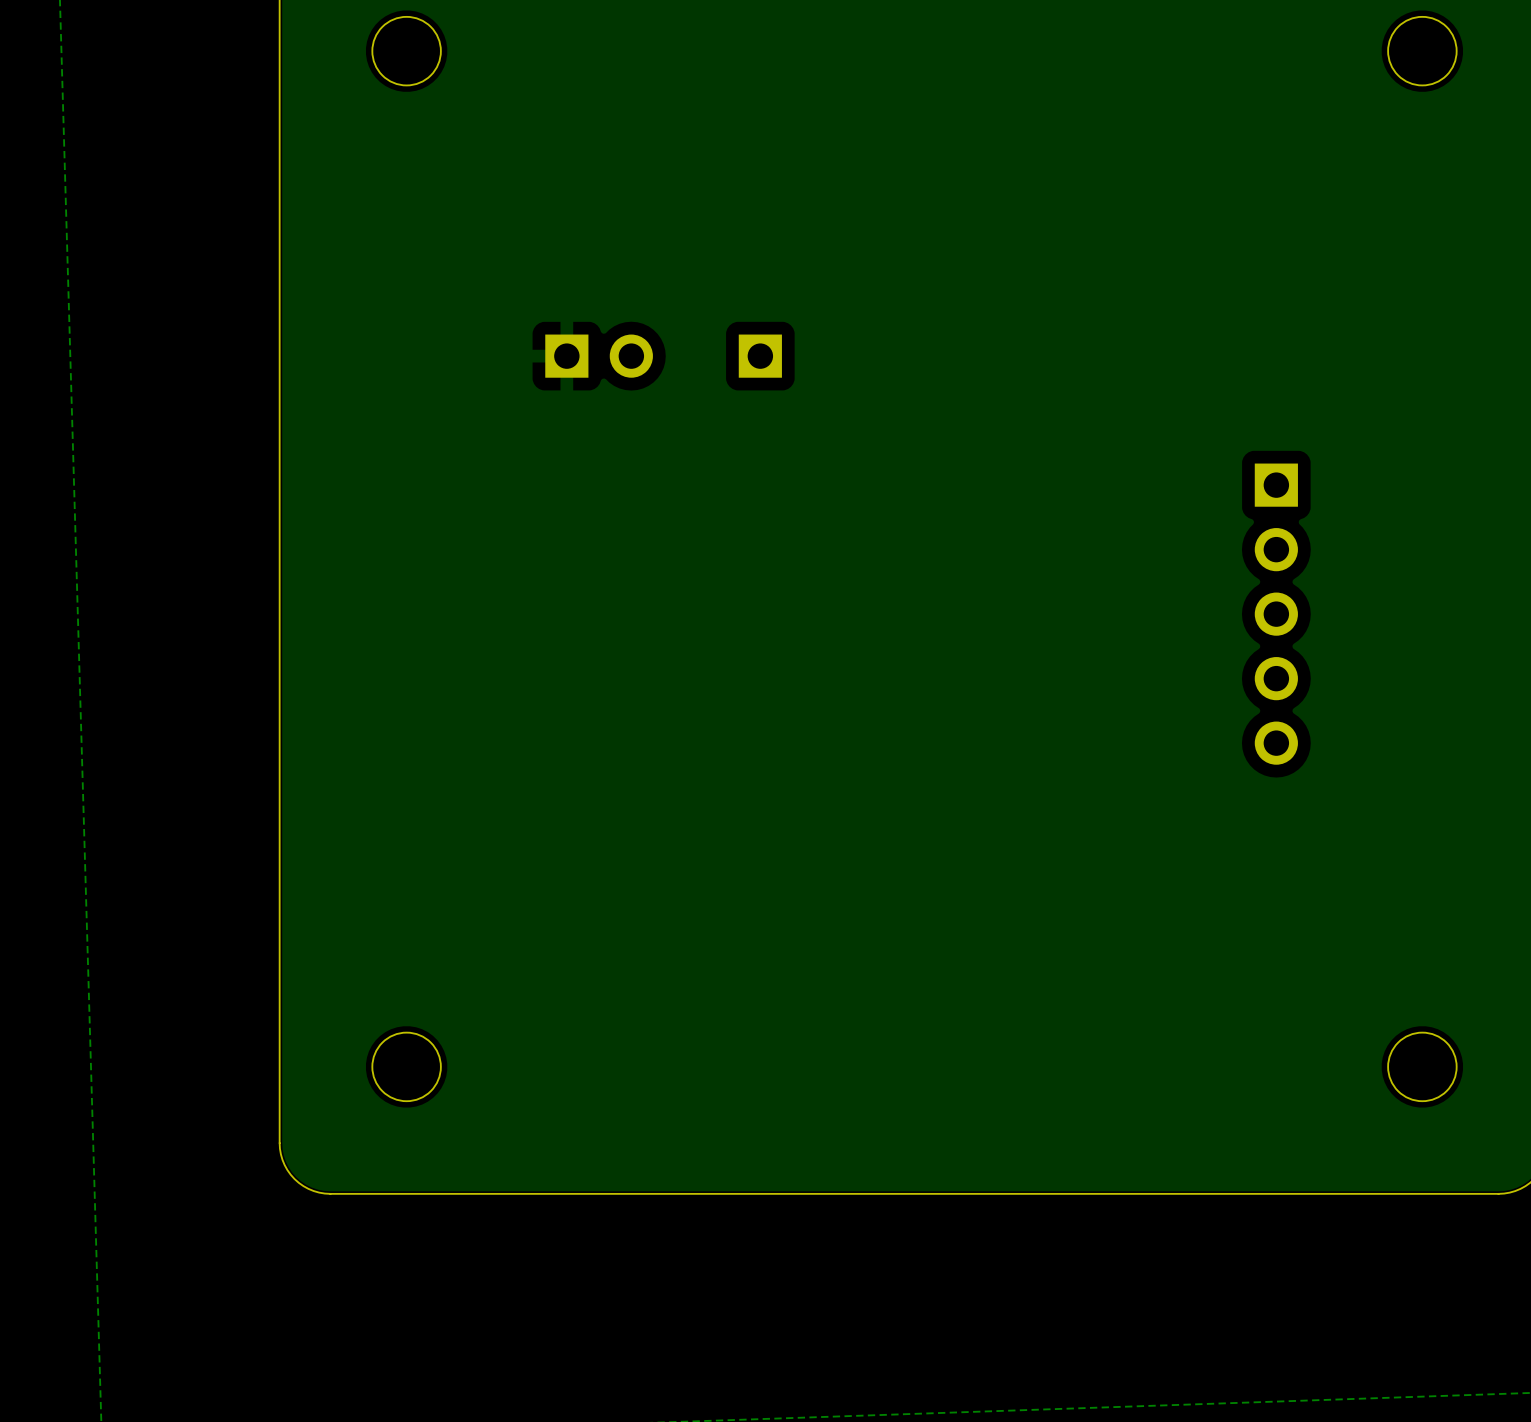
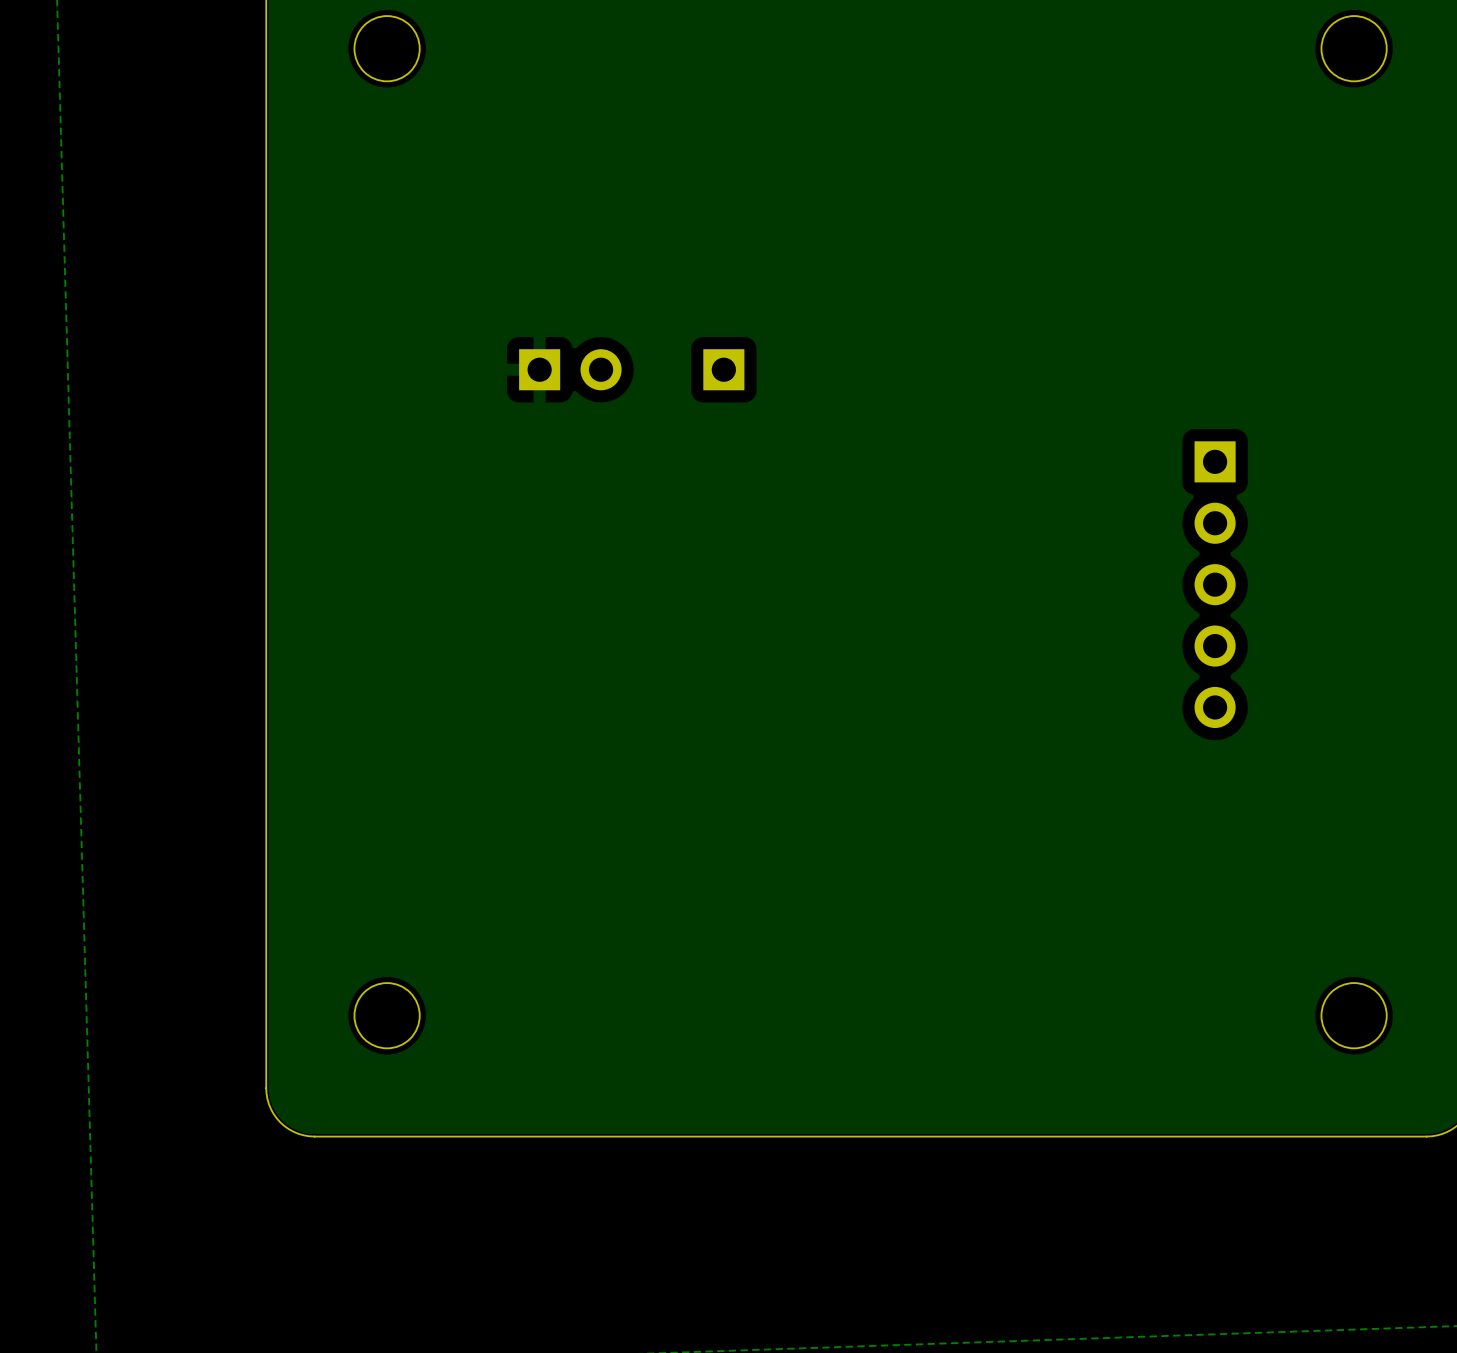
part position: (599, 356) -> (570, 369)
part position: (760, 356) -> (723, 369)

